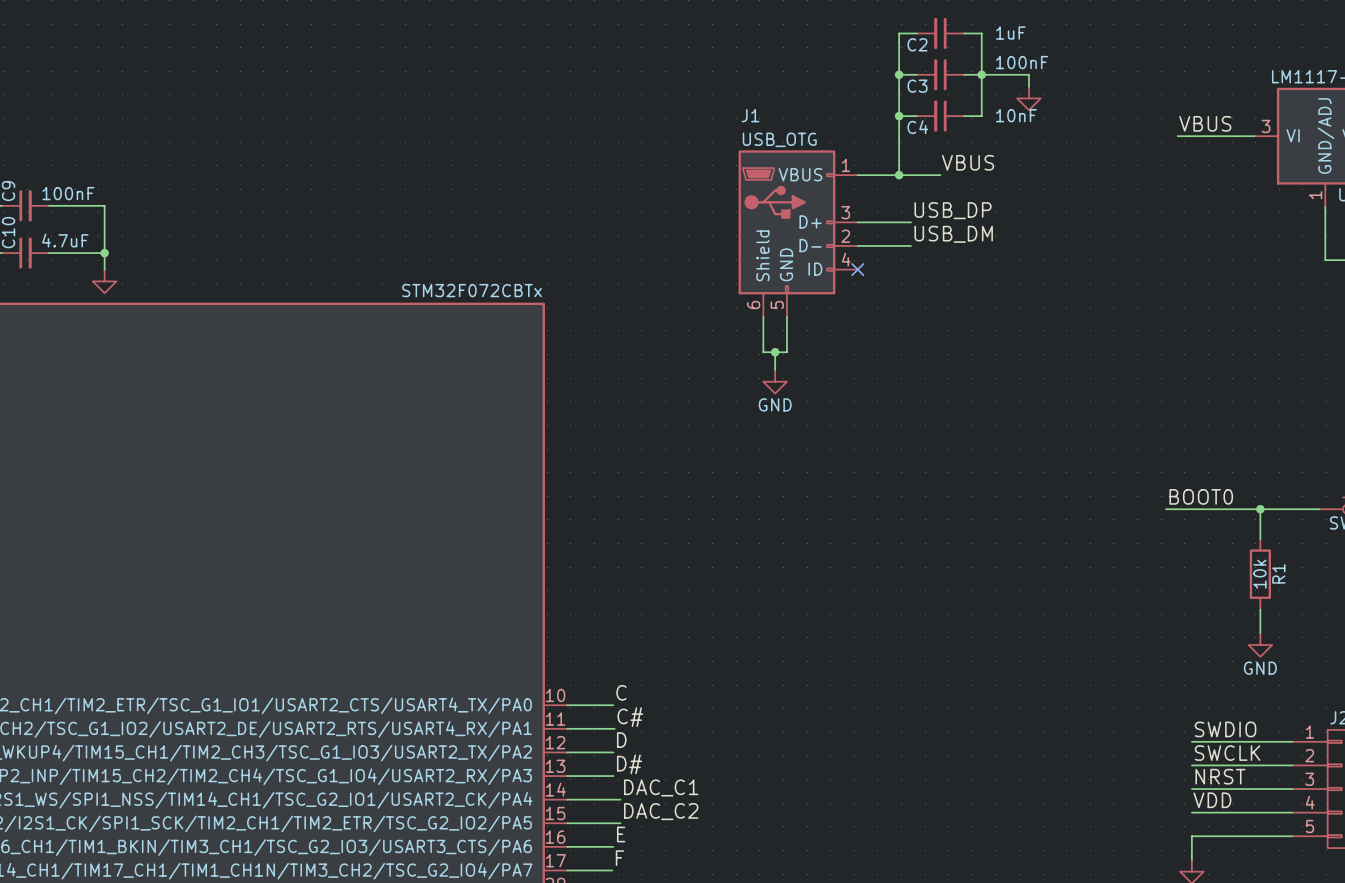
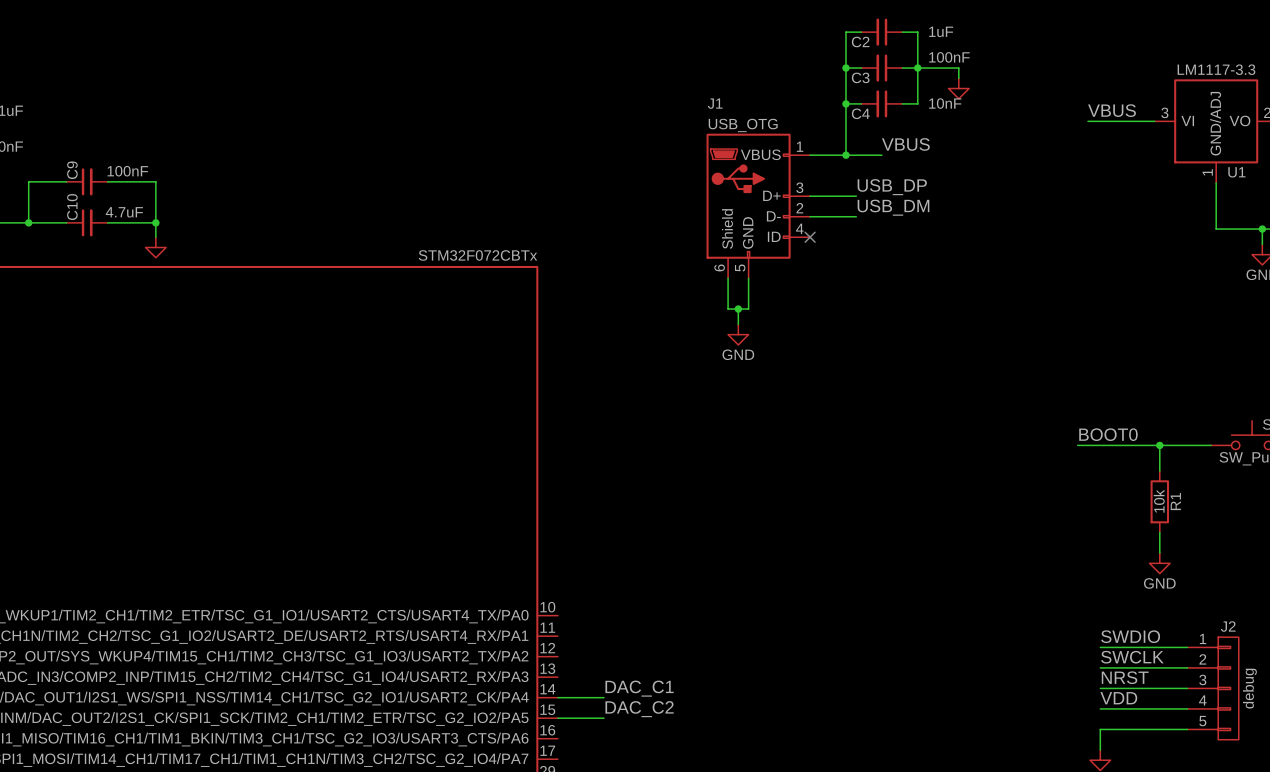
label: C (621, 692) -> none
wire: (567, 705) (613, 705) -> none
label: C# (630, 717) -> none
wire: (567, 728) (614, 728) -> none
label: D (621, 740) -> none
wire: (567, 752) (613, 752) -> none
label: D# (629, 764) -> none
wire: (567, 776) (613, 776) -> none
label: E (621, 834) -> none
wire: (567, 846) (613, 846) -> none
label: F (619, 858) -> none
wire: (567, 870) (612, 870) -> none

